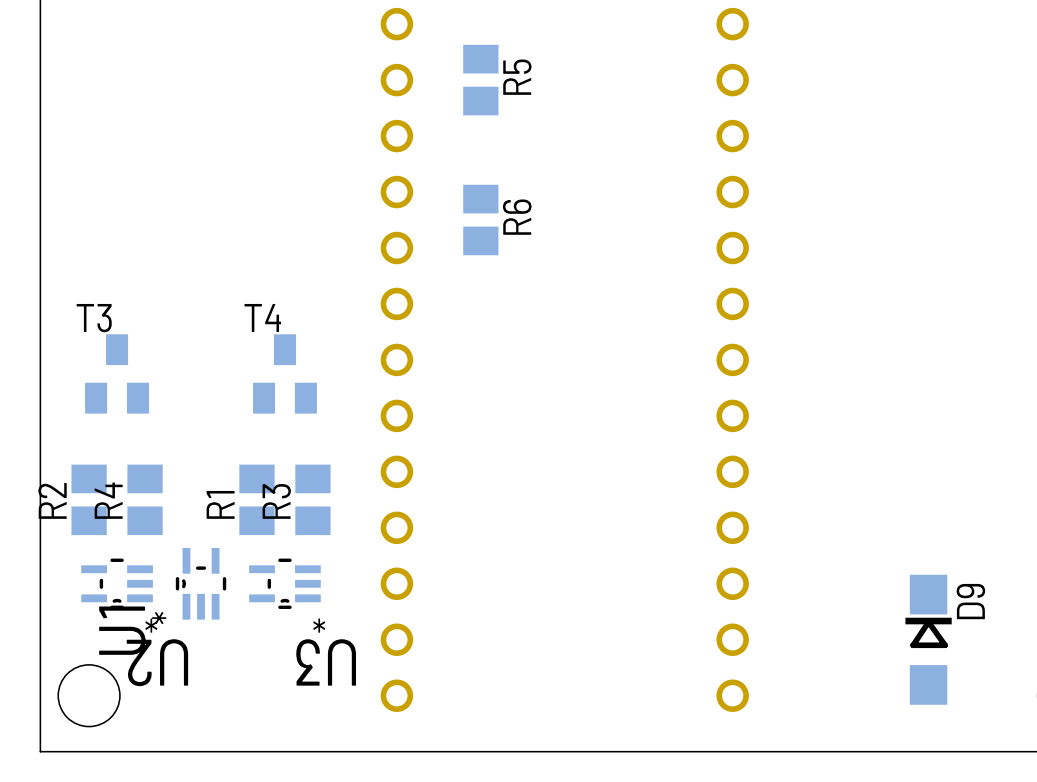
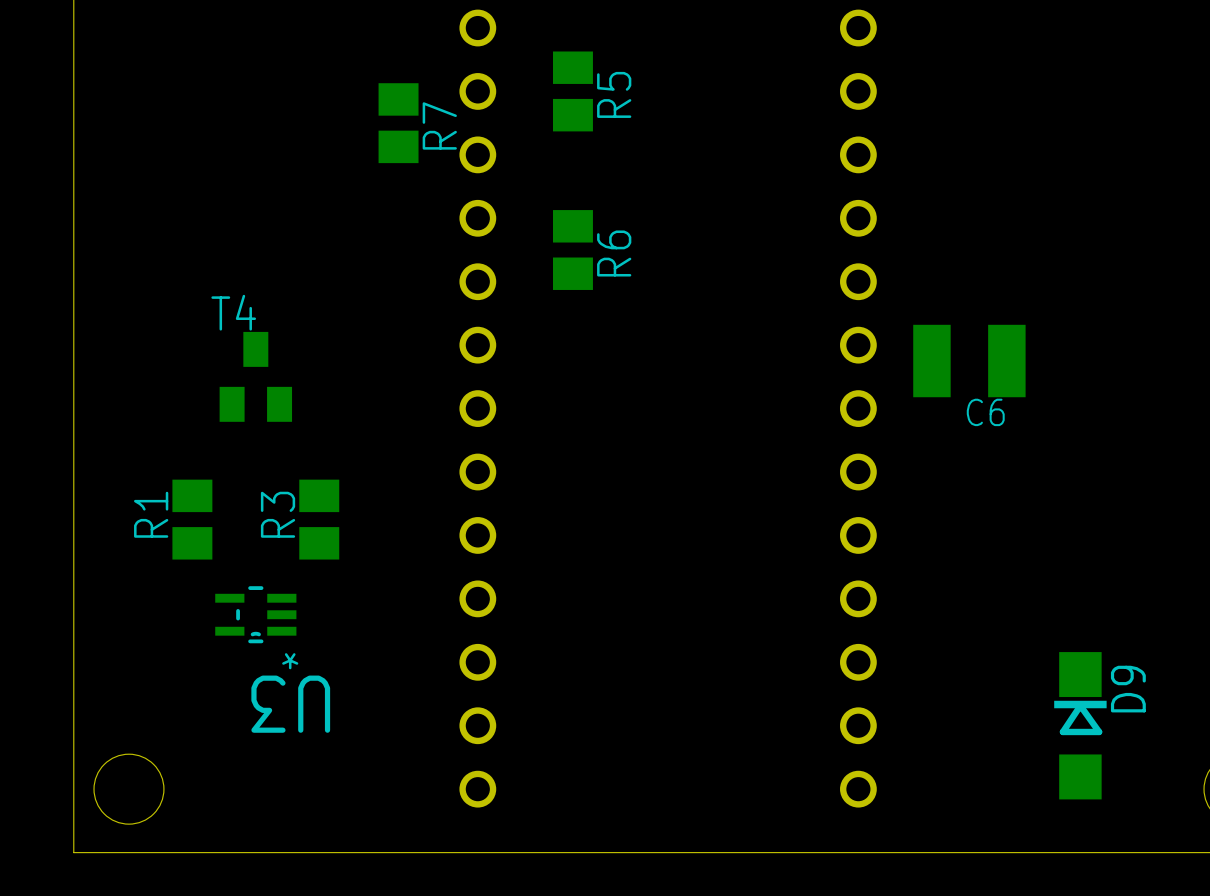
R7: none -> (398, 123)
C6: none -> (969, 361)
T3: (117, 373) -> none
T4 position: (284, 373) -> (255, 376)
R2: (89, 499) -> none
R4: (145, 499) -> none
R1 position: (256, 499) -> (192, 519)
R3 position: (312, 499) -> (319, 519)
U2: (117, 583) -> none
U1: (201, 583) -> none
U3 position: (284, 583) -> (255, 614)

